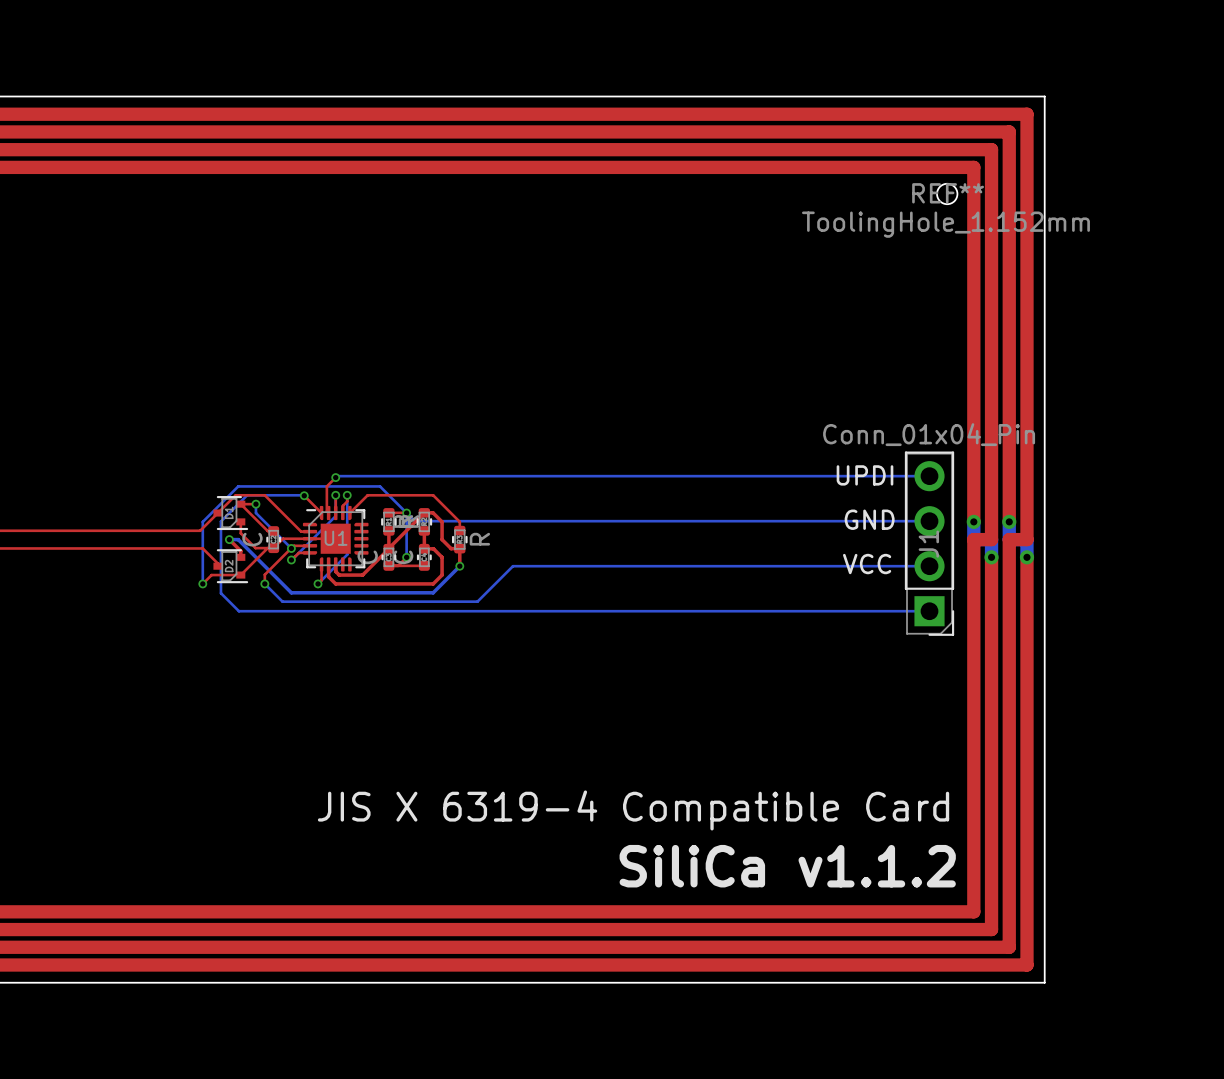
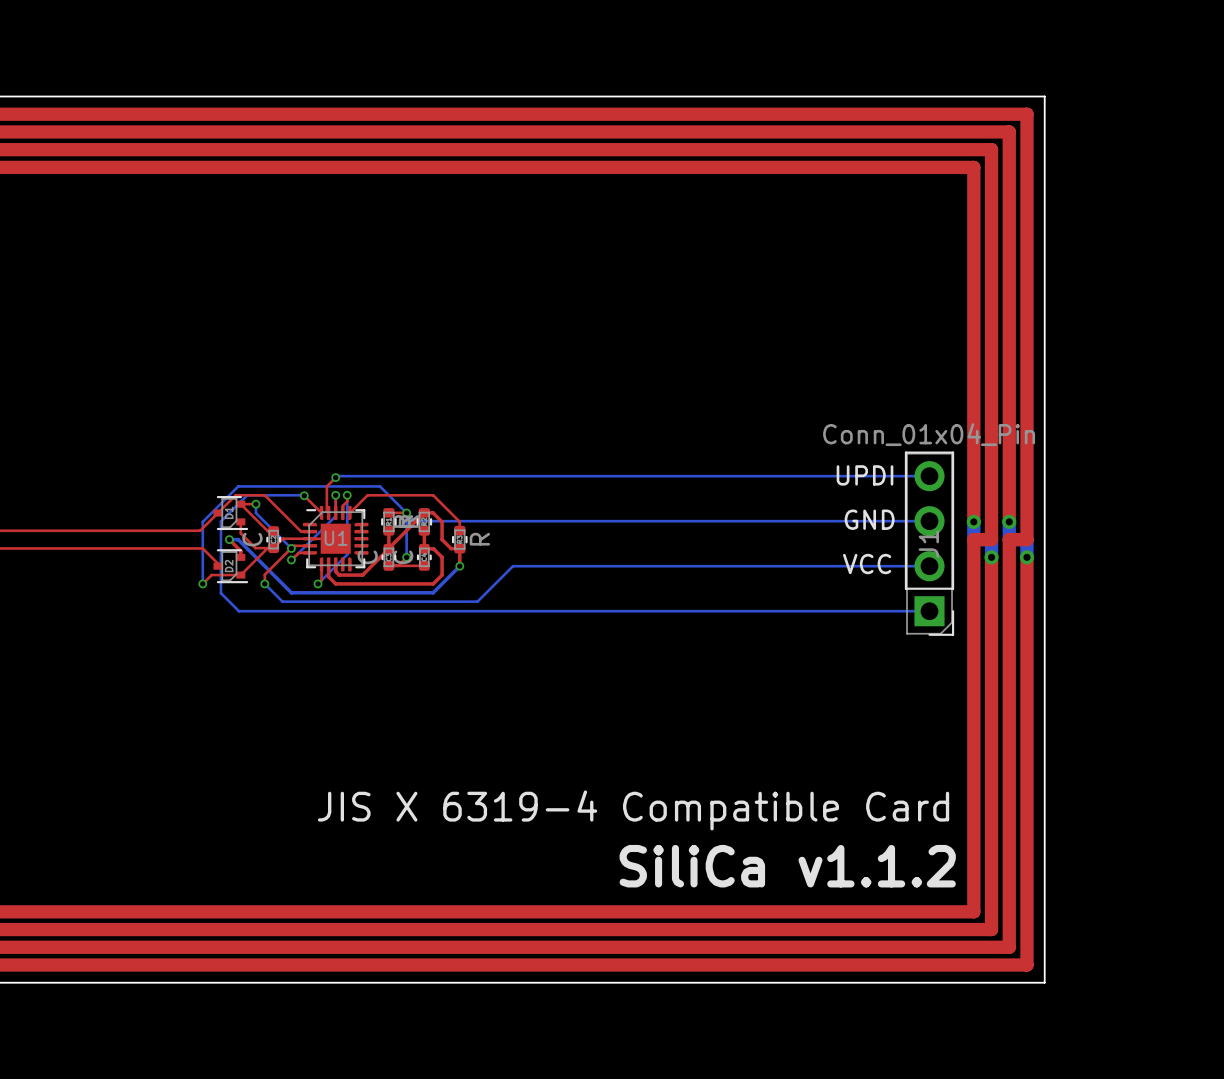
REF**: ToolingHole_1.152mm (947, 193) -> none

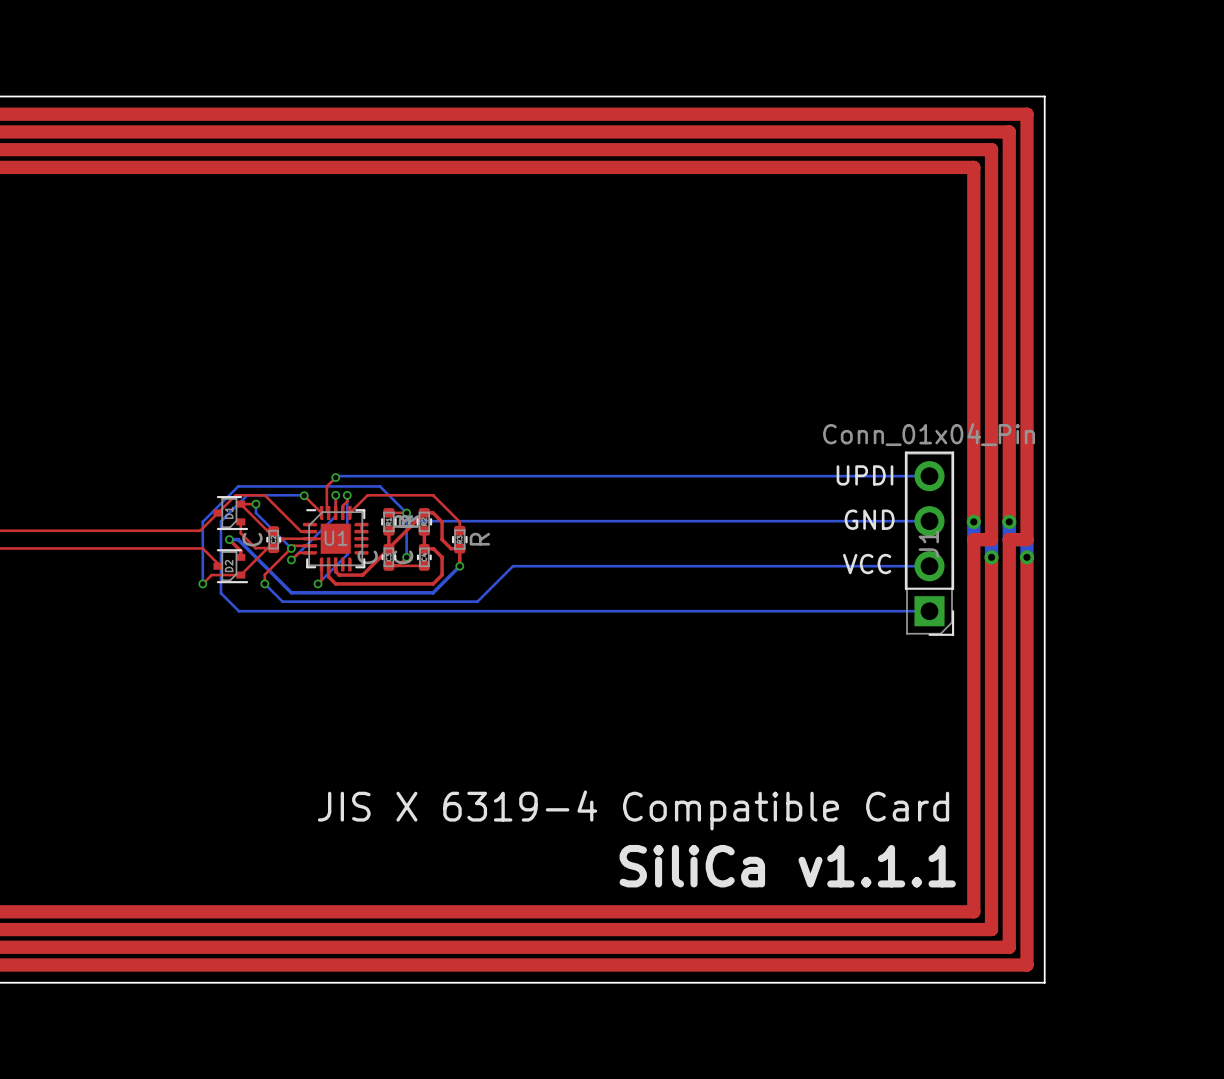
text: SiliCa v1.1.2 (787, 866) -> SiliCa v1.1.1 (787, 866)

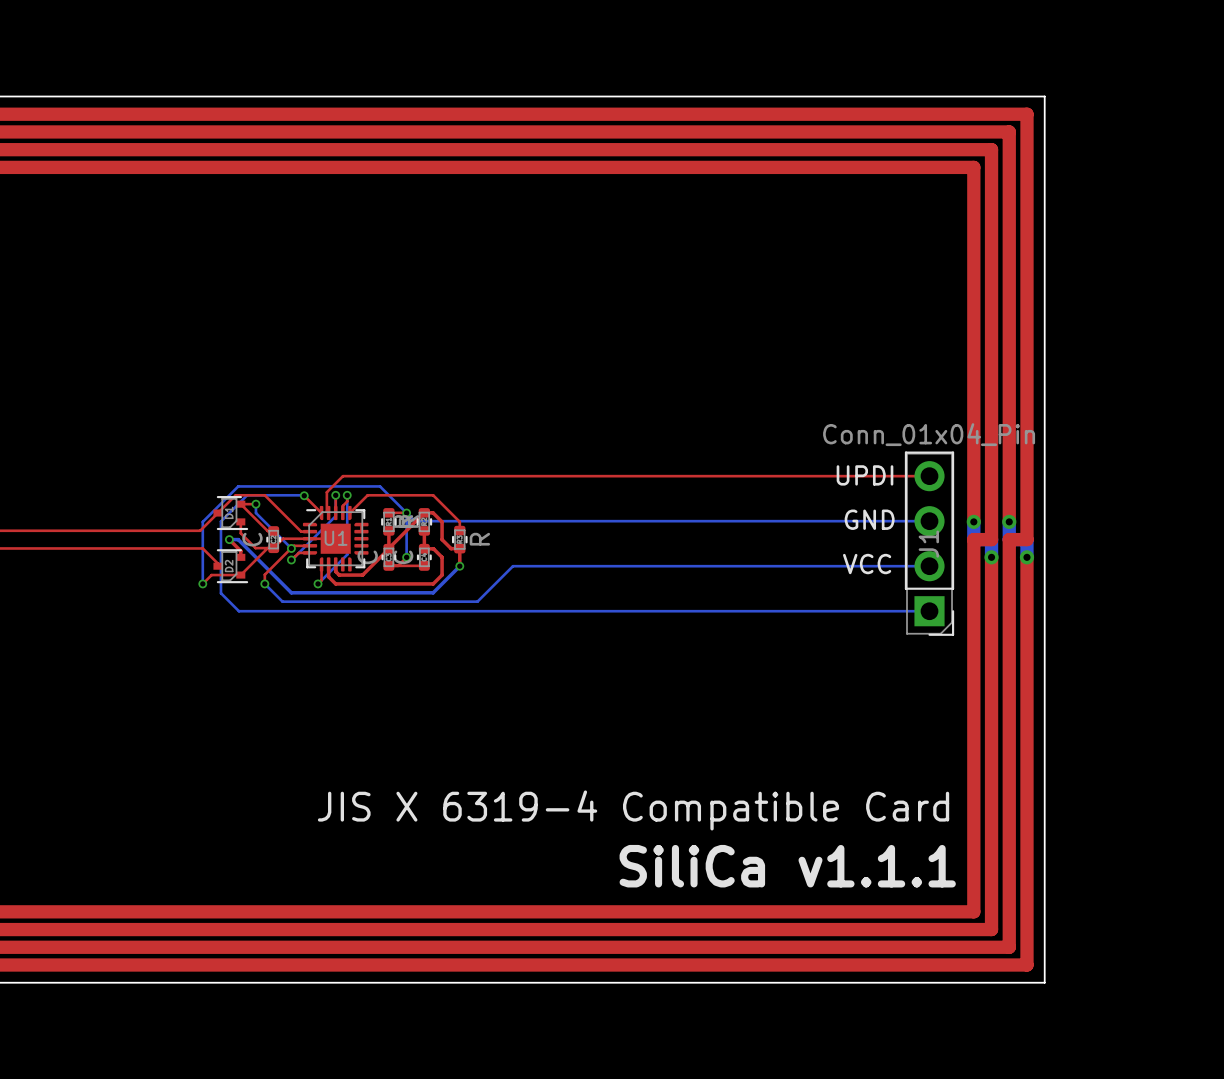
bottom track: (337, 476) (929, 476) -> none
top track: (335, 477) (326, 486) (326, 492) -> (929, 476) (342, 476) (326, 492)
via: (335, 477) -> none

